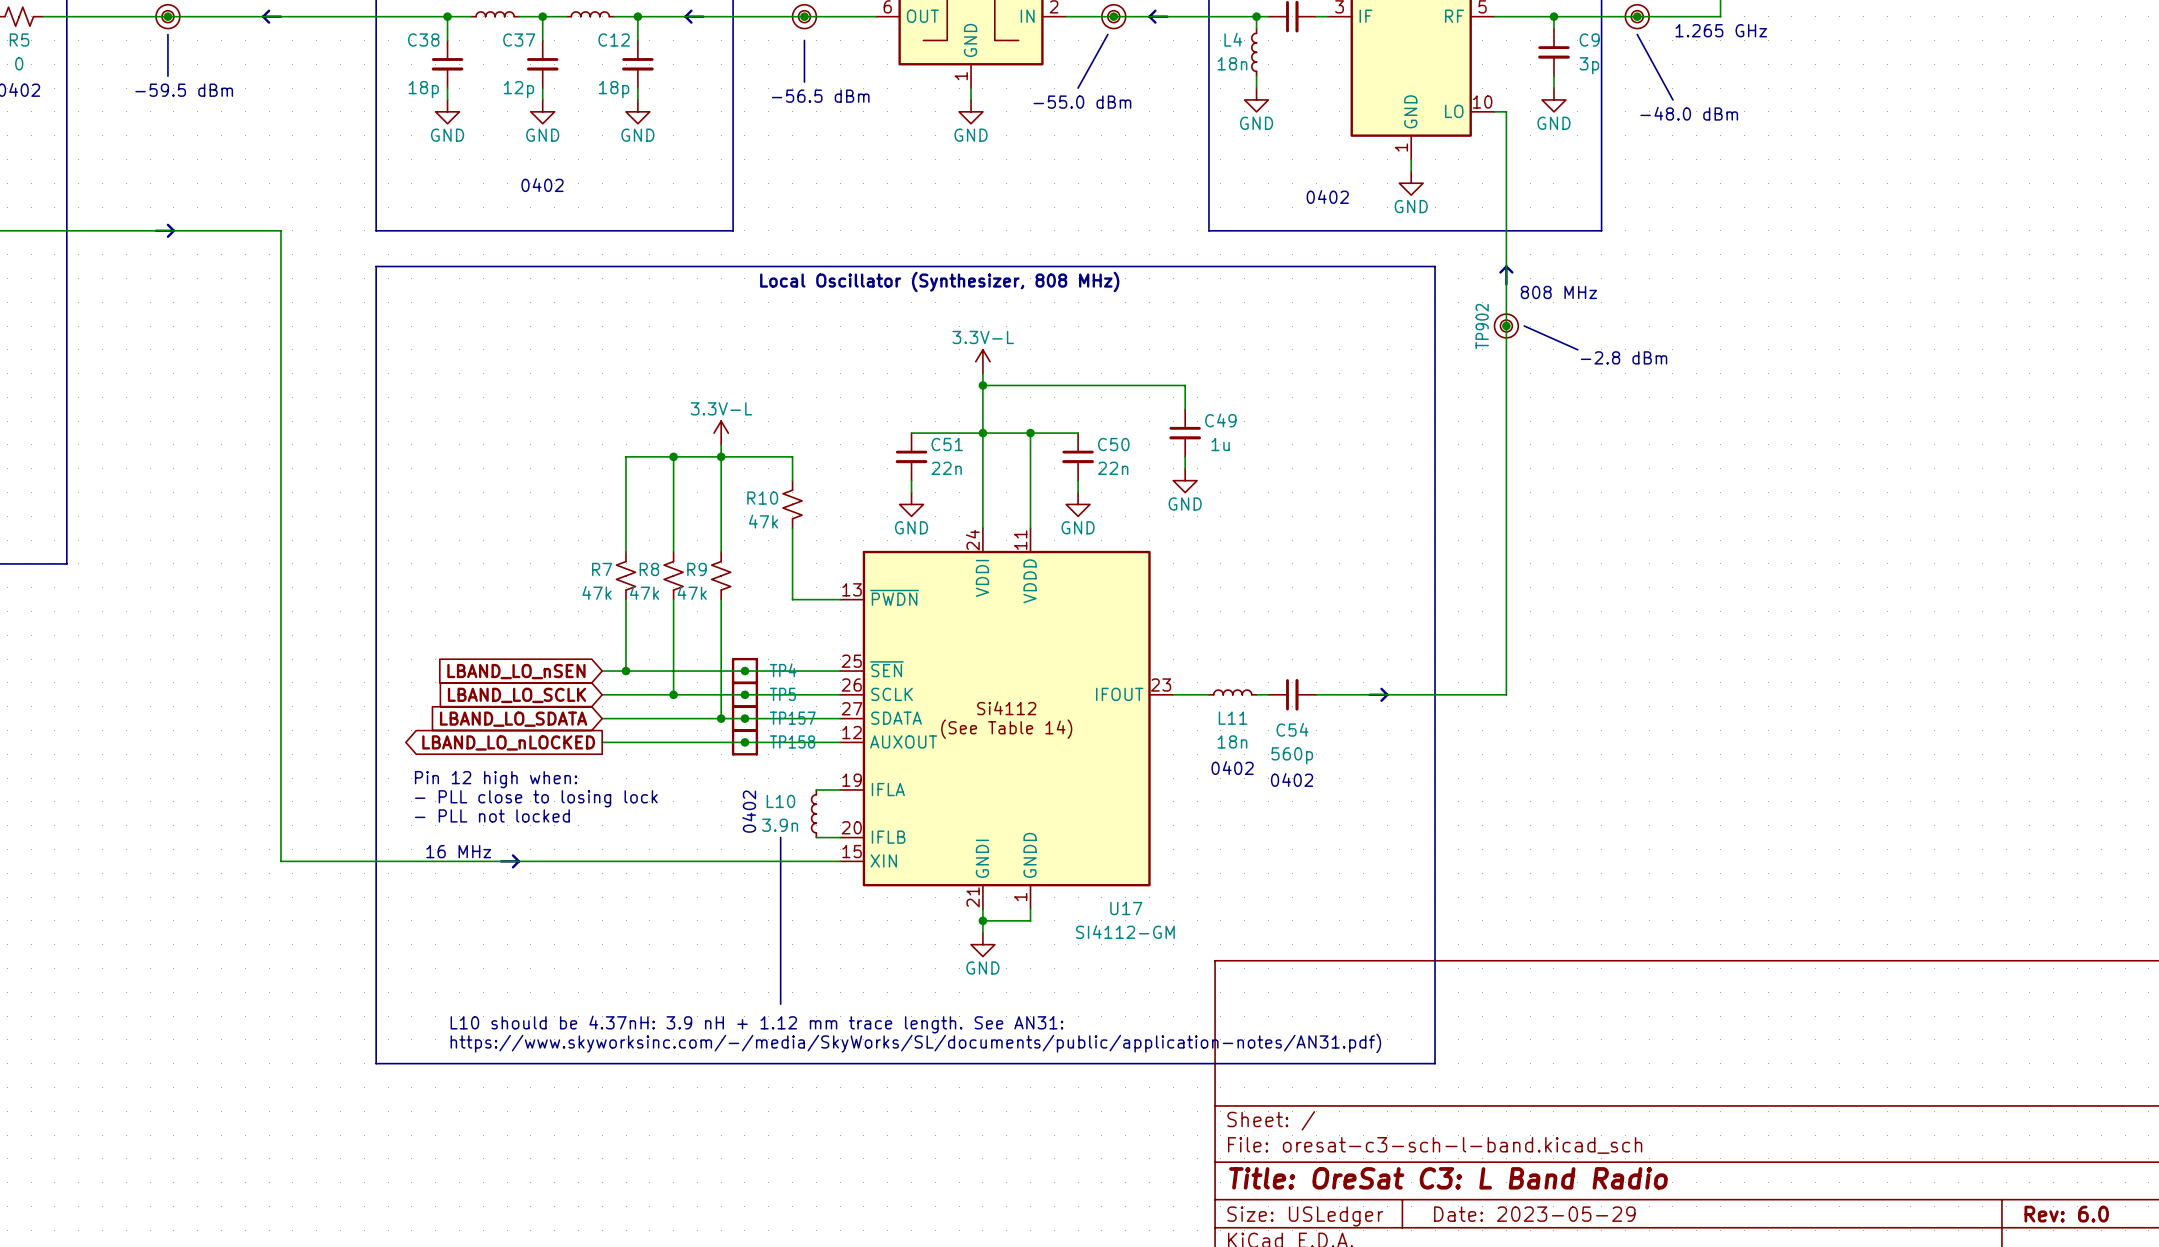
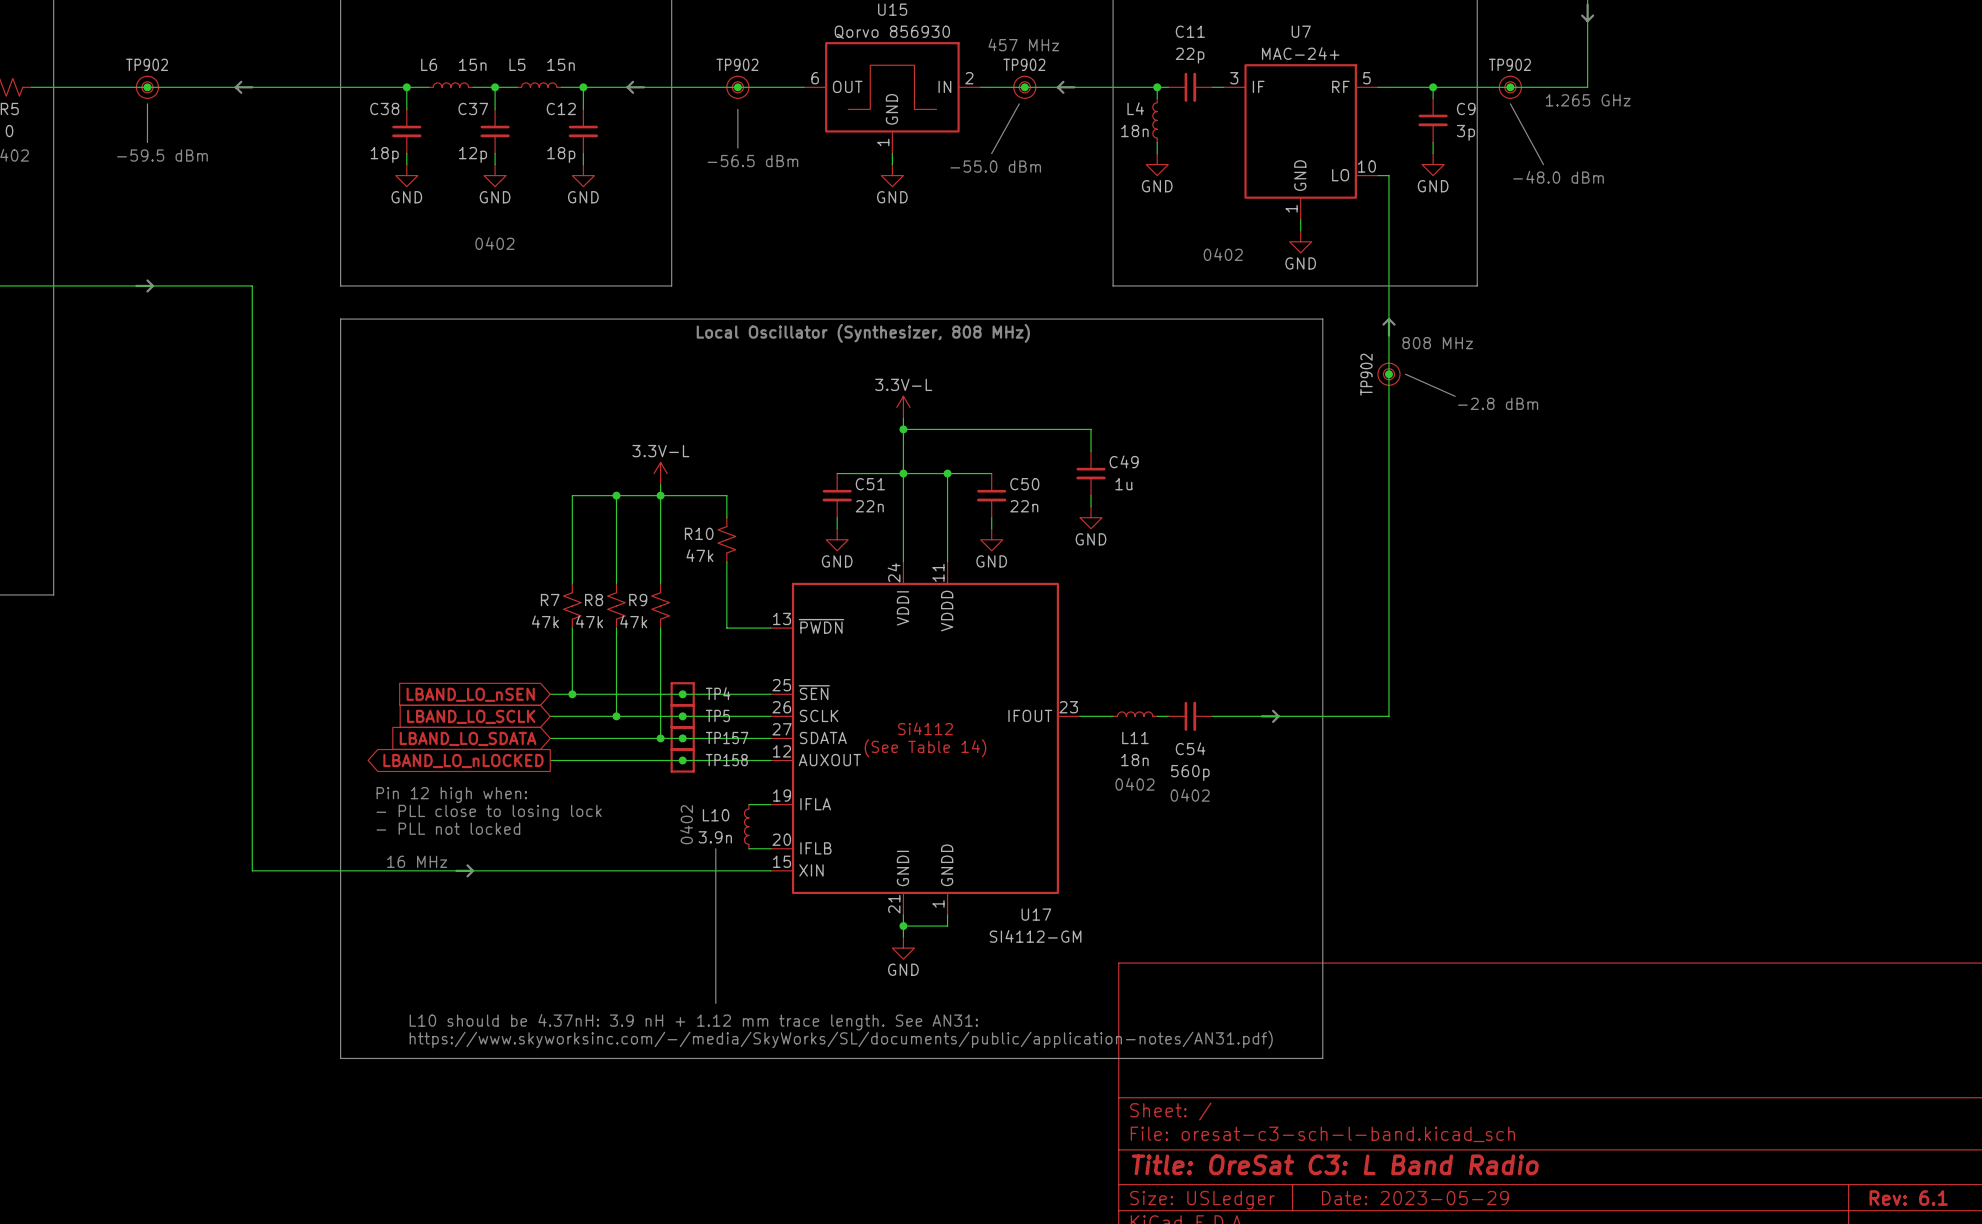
title block: Rev: 6.0 (2066, 1214) -> Rev: 6.1 (1908, 1198)

